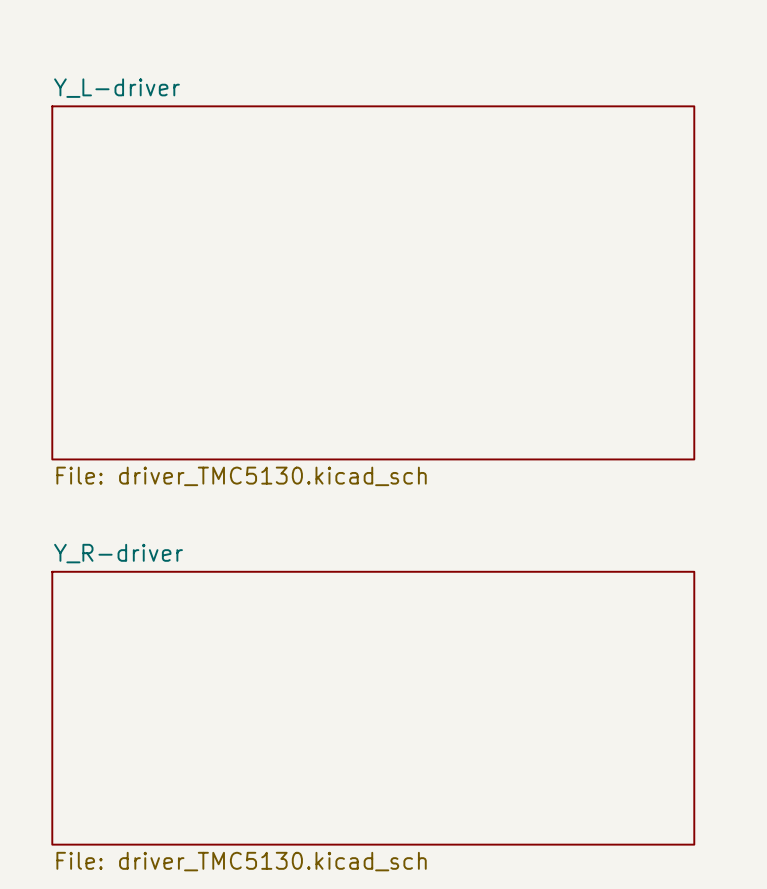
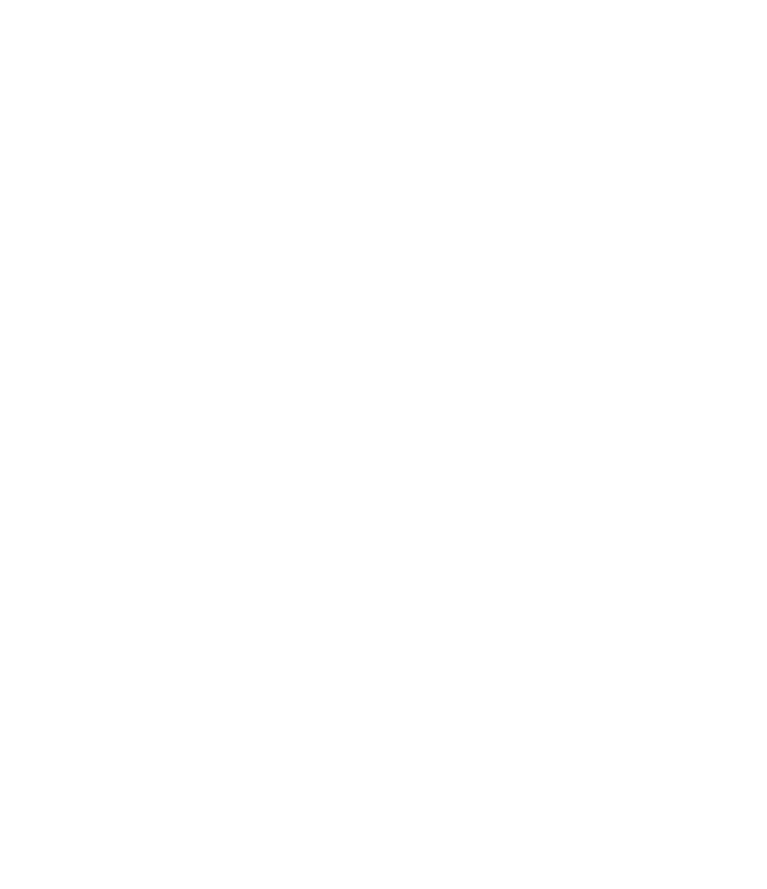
sheet Y_L-driver: File: driver_TMC5130.kicad_sch (373, 282) -> none
sheet Y_R-driver: File: driver_TMC5130.kicad_sch (373, 708) -> none

